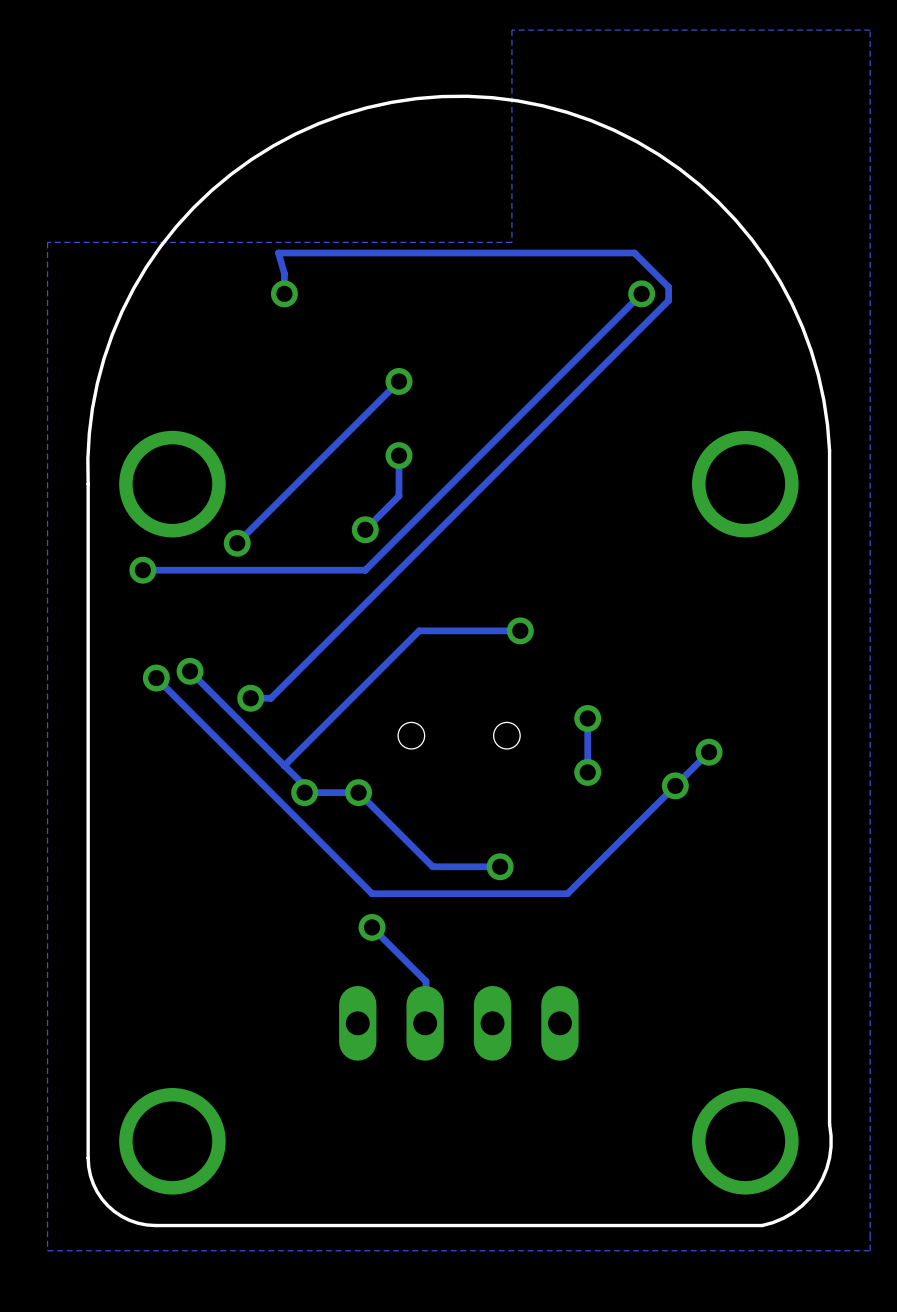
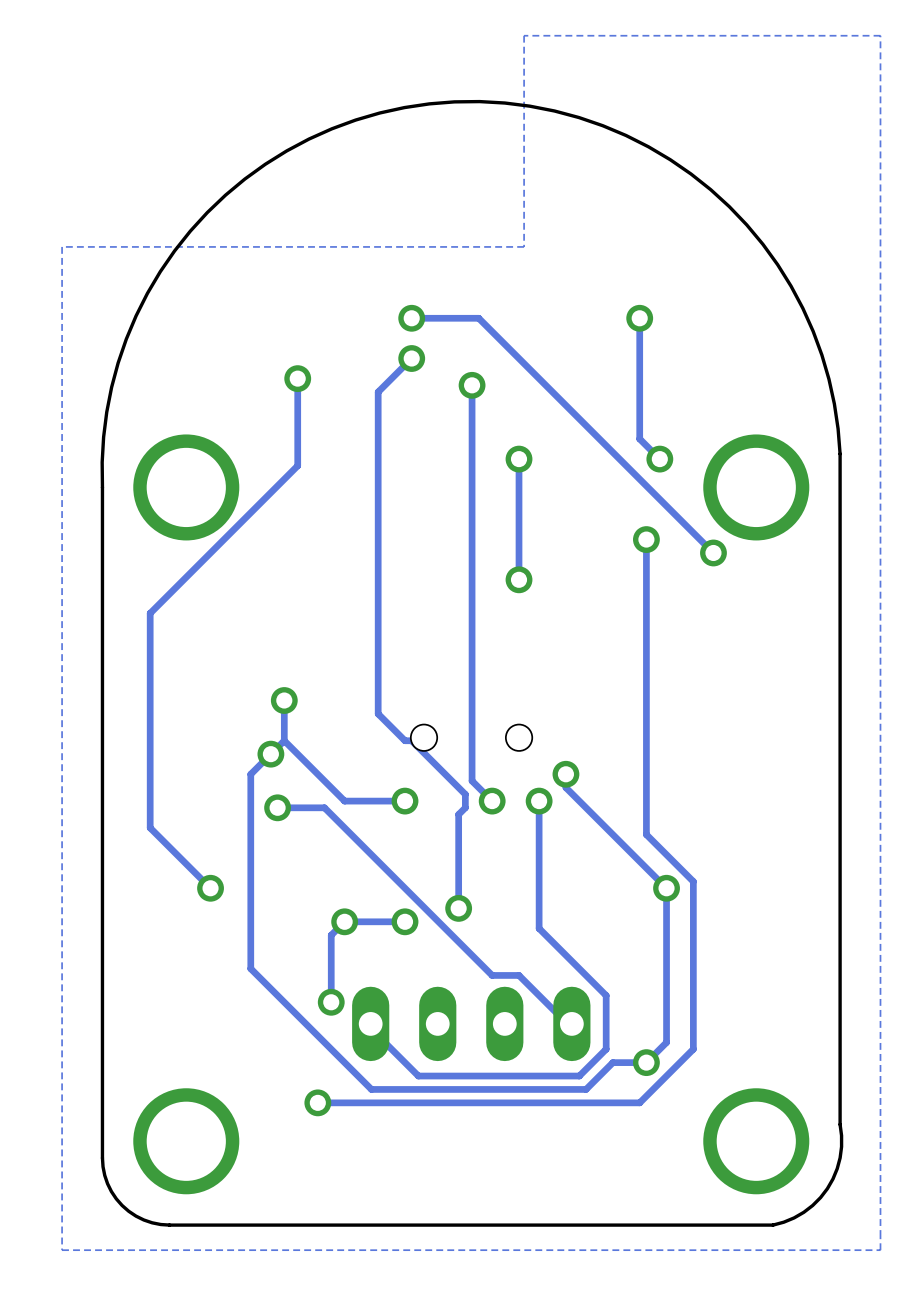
track: (284, 293) (284, 273) (278, 253) (634, 253) (668, 287) (668, 300) (270, 698) (250, 698) -> none
via: (284, 293) -> none
track: (641, 293) (365, 570) (142, 570) -> none
via position: (641, 293) -> (639, 318)
track: none -> (411, 318) (478, 318) (713, 552)
via: none -> (411, 318)
track: none -> (639, 318) (639, 438) (659, 459)
track: none -> (411, 358) (378, 392) (378, 713) (405, 740) (411, 740) (465, 794) (465, 807) (458, 814) (458, 908)
track: none -> (297, 378) (297, 465) (150, 613) (150, 827) (210, 888)
via: none -> (297, 378)
track: (399, 381) (237, 543) -> none
via position: (399, 381) -> (411, 358)
track: none -> (472, 385) (472, 780) (492, 801)
via: none -> (472, 385)
track: (399, 455) (399, 496) (365, 529) -> none
via: (399, 455) -> none
track: none -> (519, 459) (519, 579)
via: none -> (519, 459)
via: none -> (659, 459)
via: (365, 529) -> none
track: none -> (646, 539) (646, 834) (693, 881) (693, 1049) (639, 1102) (317, 1102)
via: none -> (646, 539)
via: (237, 543) -> none
via: none -> (713, 552)
via: (142, 570) -> none
track: (520, 630) (419, 630) (284, 765) -> none
via position: (520, 630) -> (519, 579)
track: (190, 671) (311, 792) -> none
via: (190, 671) -> none
track: (156, 678) (372, 893) (567, 893) (709, 752) -> none
via: (156, 678) -> none
via position: (250, 698) -> (284, 700)
track: none -> (284, 700) (284, 740)
track: (587, 718) (587, 772) -> none
via: (587, 718) -> none
track: none -> (284, 740) (344, 801) (405, 801)
track: none -> (284, 740) (250, 774) (250, 968) (371, 1089) (586, 1089) (612, 1062) (646, 1062) (666, 1042) (666, 888) (565, 787) (565, 774)
via: none -> (270, 754)
via: (709, 752) -> none
via: none -> (565, 774)
via: (587, 772) -> none
via: (675, 785) -> none
track: (304, 792) (358, 792) (432, 866) (500, 866) -> none
via: (304, 792) -> none
via position: (358, 792) -> (405, 801)
via: none -> (492, 801)
track: none -> (539, 801) (539, 928) (606, 995) (606, 1049) (579, 1076) (418, 1076) (371, 1029) (370, 1023)
via: none -> (539, 801)
track: none -> (277, 807) (324, 807) (492, 975) (519, 975) (565, 1022) (571, 1023)
via: none -> (277, 807)
via: (500, 866) -> none
via: none -> (210, 888)
via: none -> (666, 888)
via: none -> (458, 908)
via: none -> (344, 921)
track: none -> (405, 921) (344, 921) (331, 935) (331, 1002)
track: (372, 927) (425, 981) (425, 1023) -> none
via position: (372, 927) -> (405, 921)
via: none -> (331, 1002)
via: none -> (646, 1062)
via: none -> (317, 1102)

